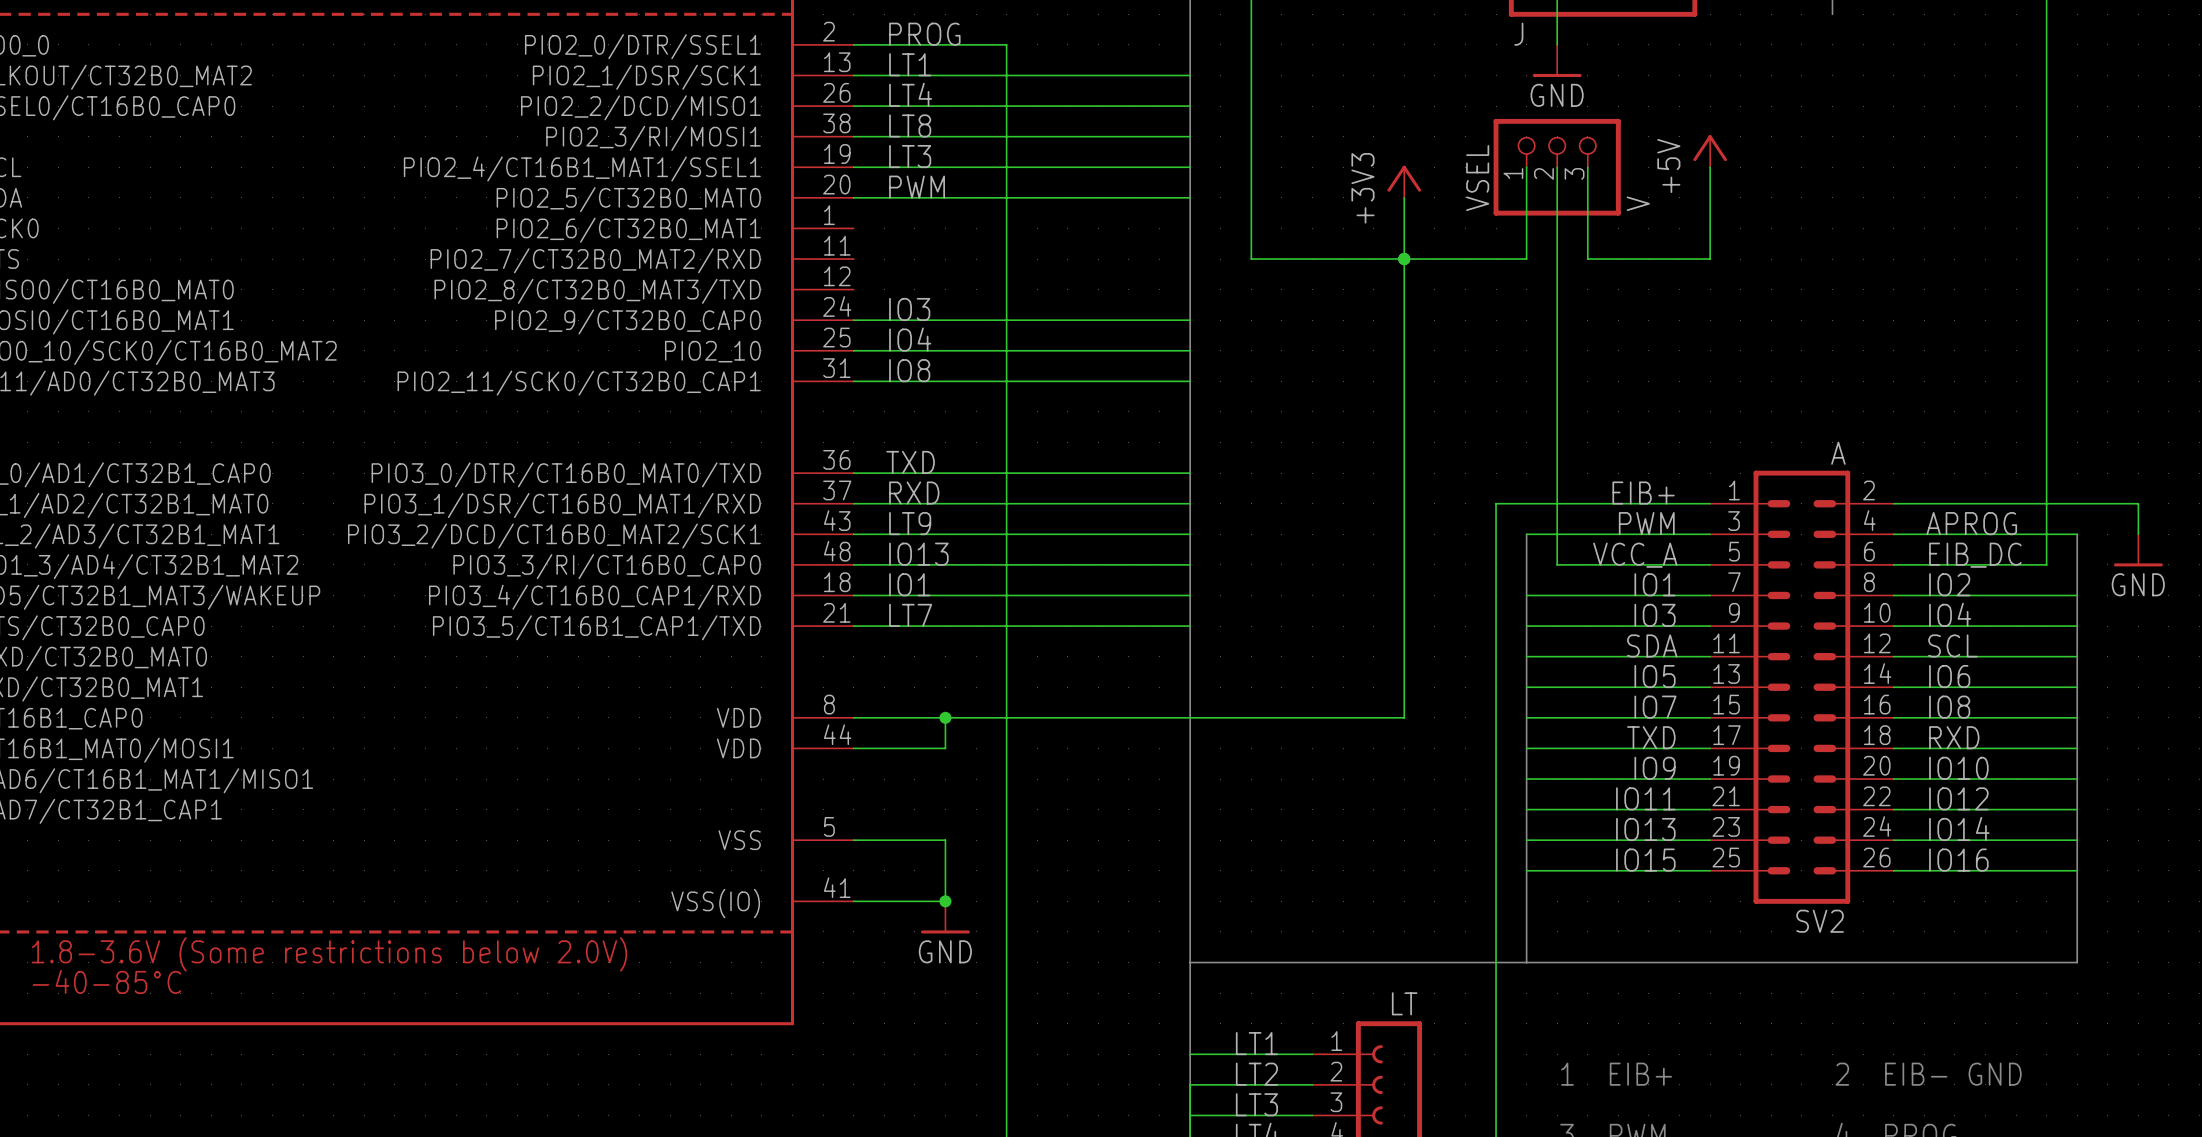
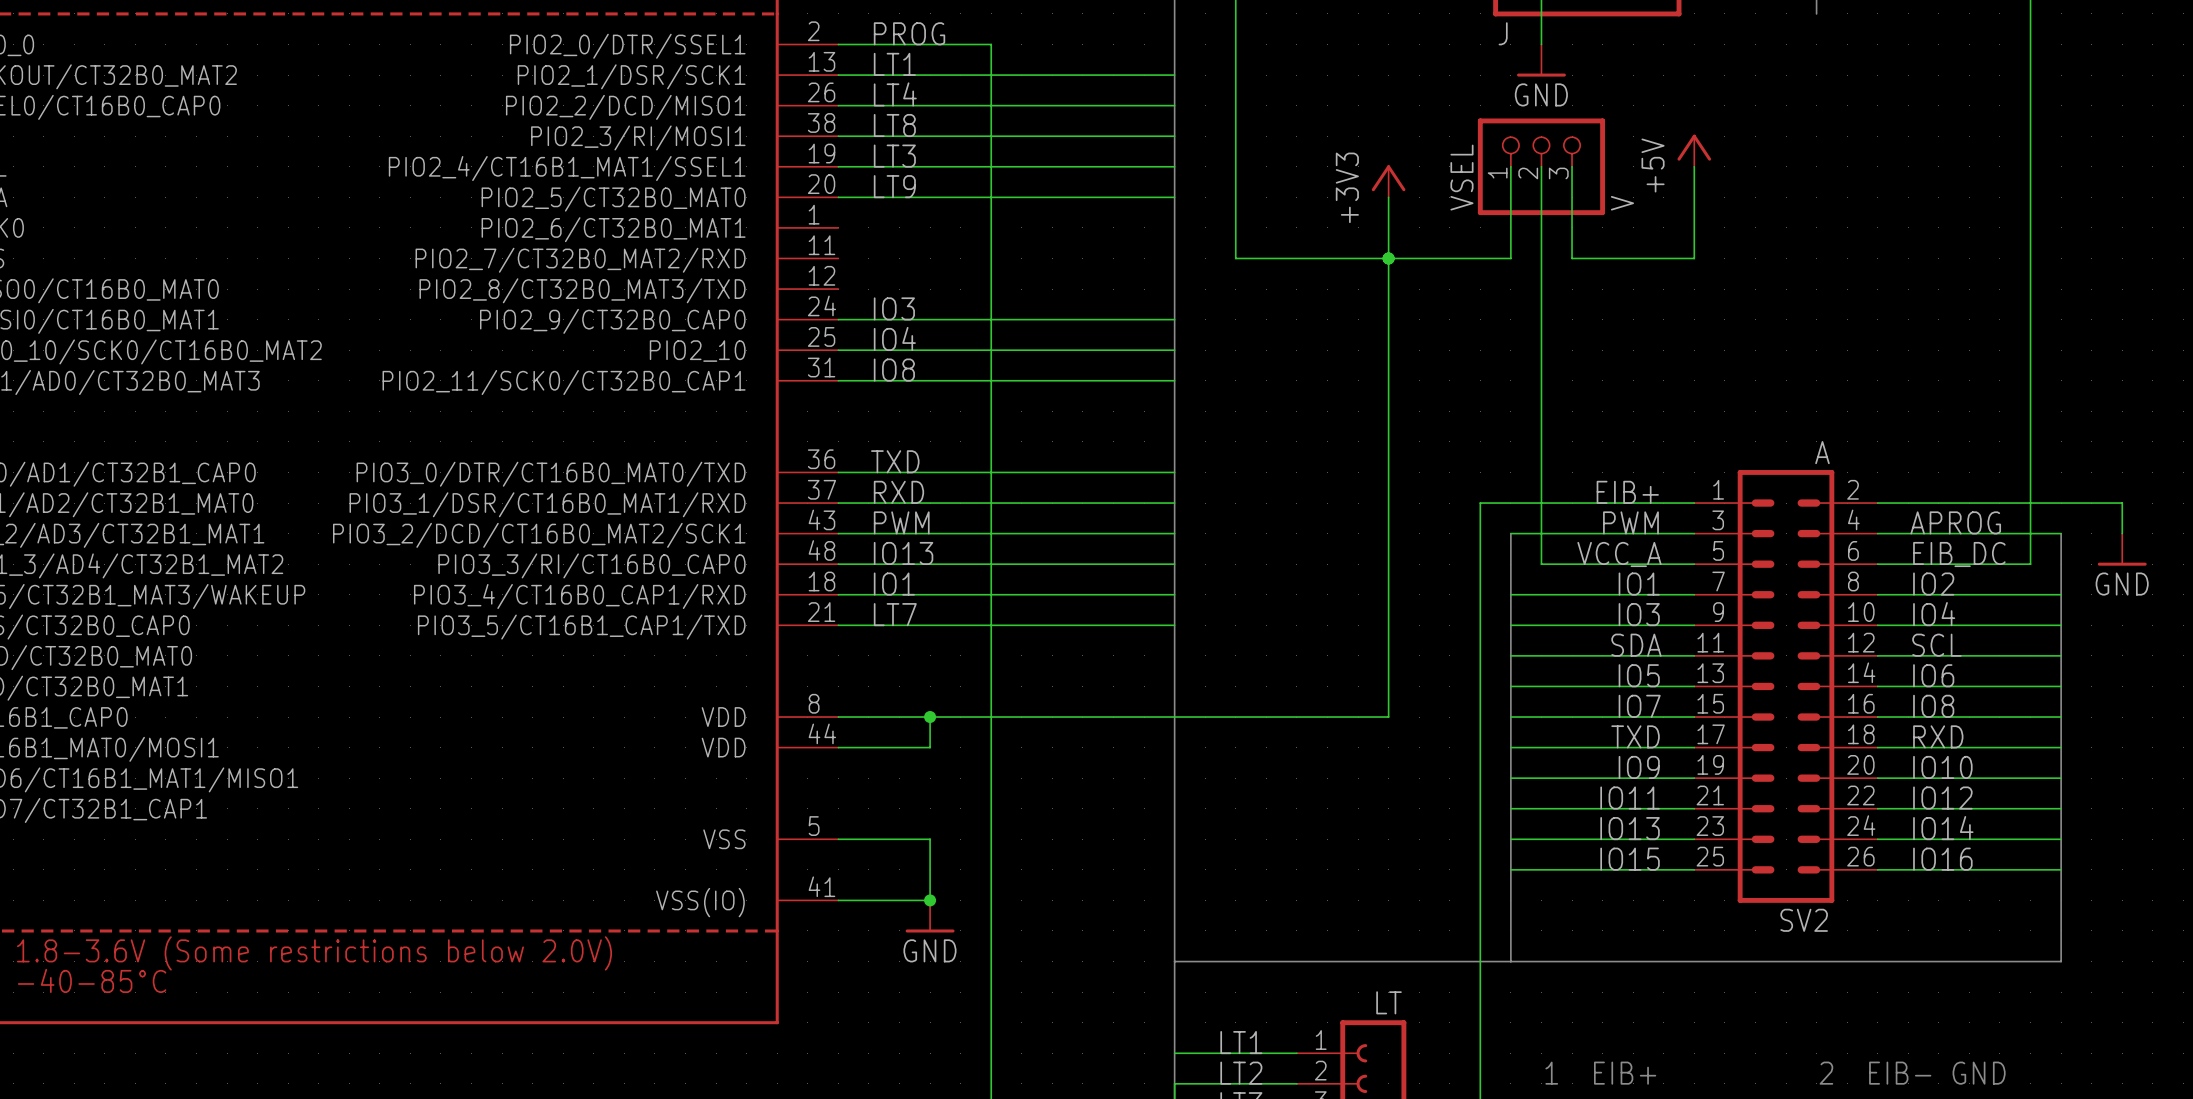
label: PWM (917, 187) -> LT9 (894, 186)
label: LT9 (910, 523) -> PWM (901, 522)

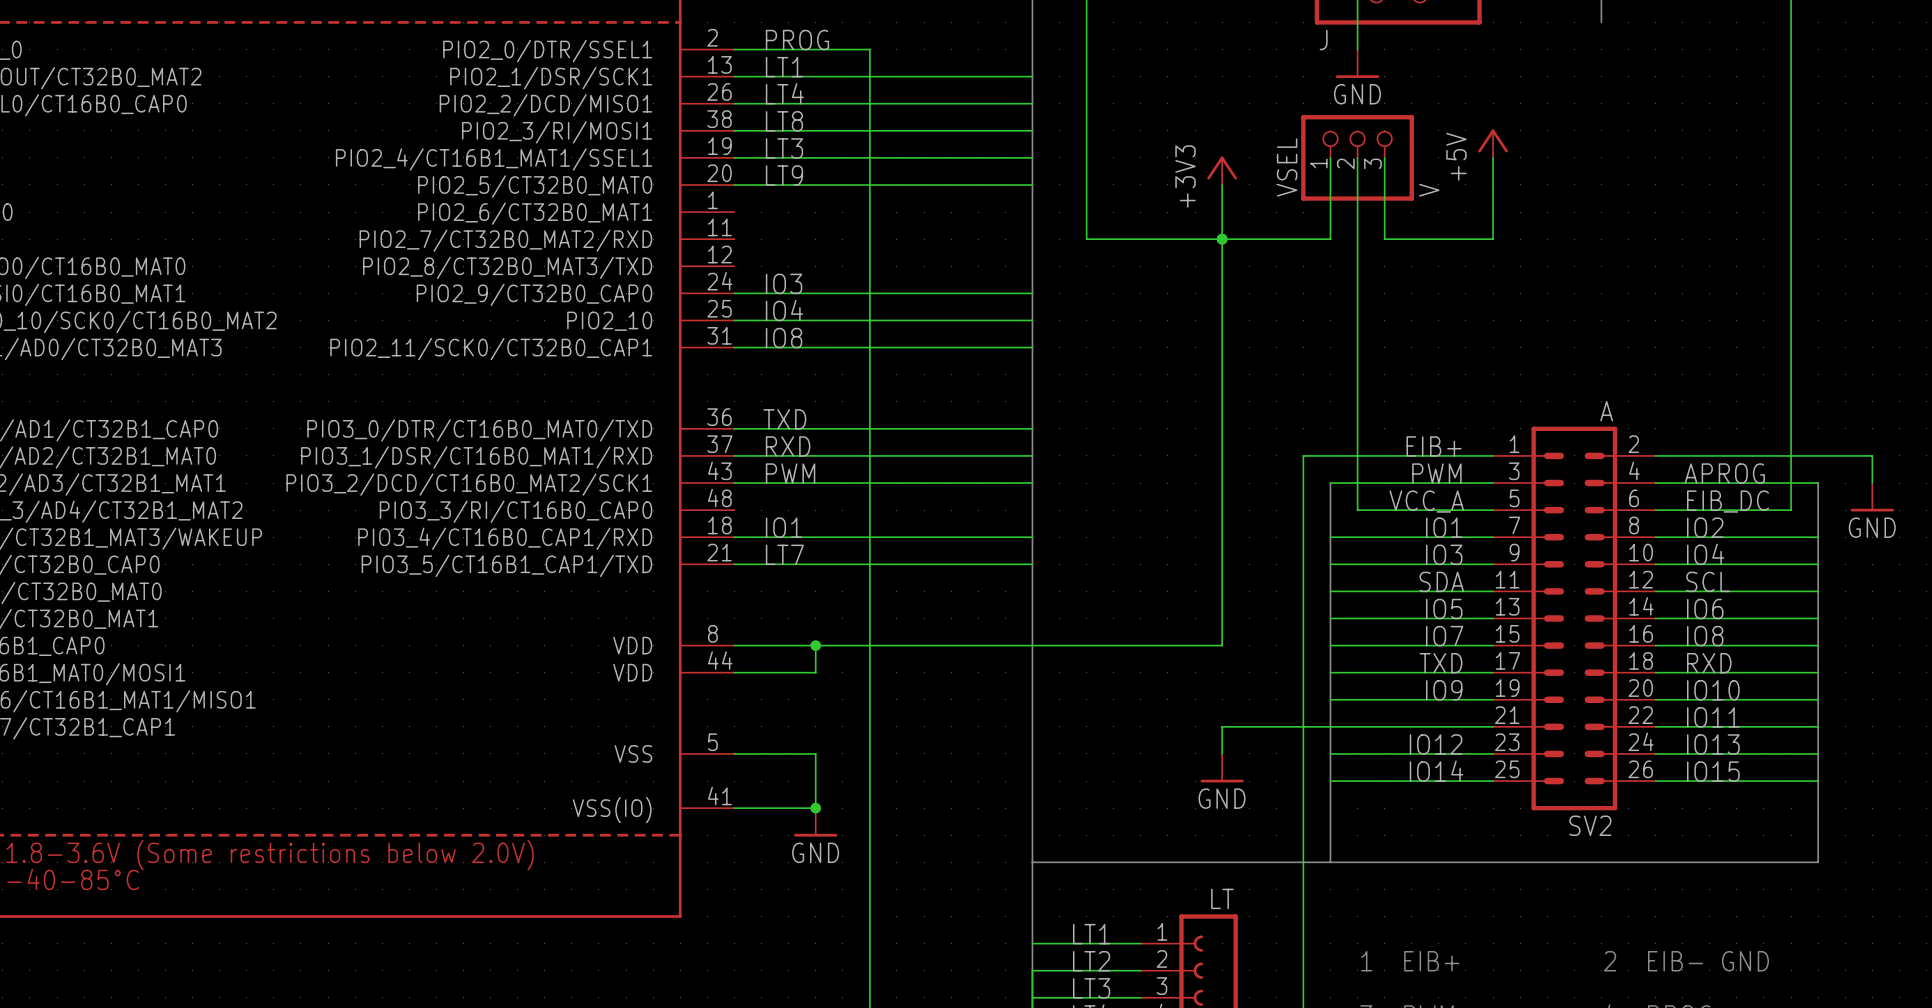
label: IO13 (903, 553) -> none
wire: (838, 564) (1174, 564) -> none
label: IO11 (1630, 798) -> none
label: IO12 (1942, 798) -> IO11 (1713, 717)
wire: none -> (1330, 726) (1222, 726) (1222, 753)
label: IO13 (1630, 828) -> IO12 (1436, 744)
label: IO14 (1943, 828) -> IO13 (1713, 744)
power symbol: none -> GND (1222, 768)
label: IO15 (1630, 859) -> IO14 (1436, 771)
label: IO16 (1942, 859) -> IO15 (1713, 771)

